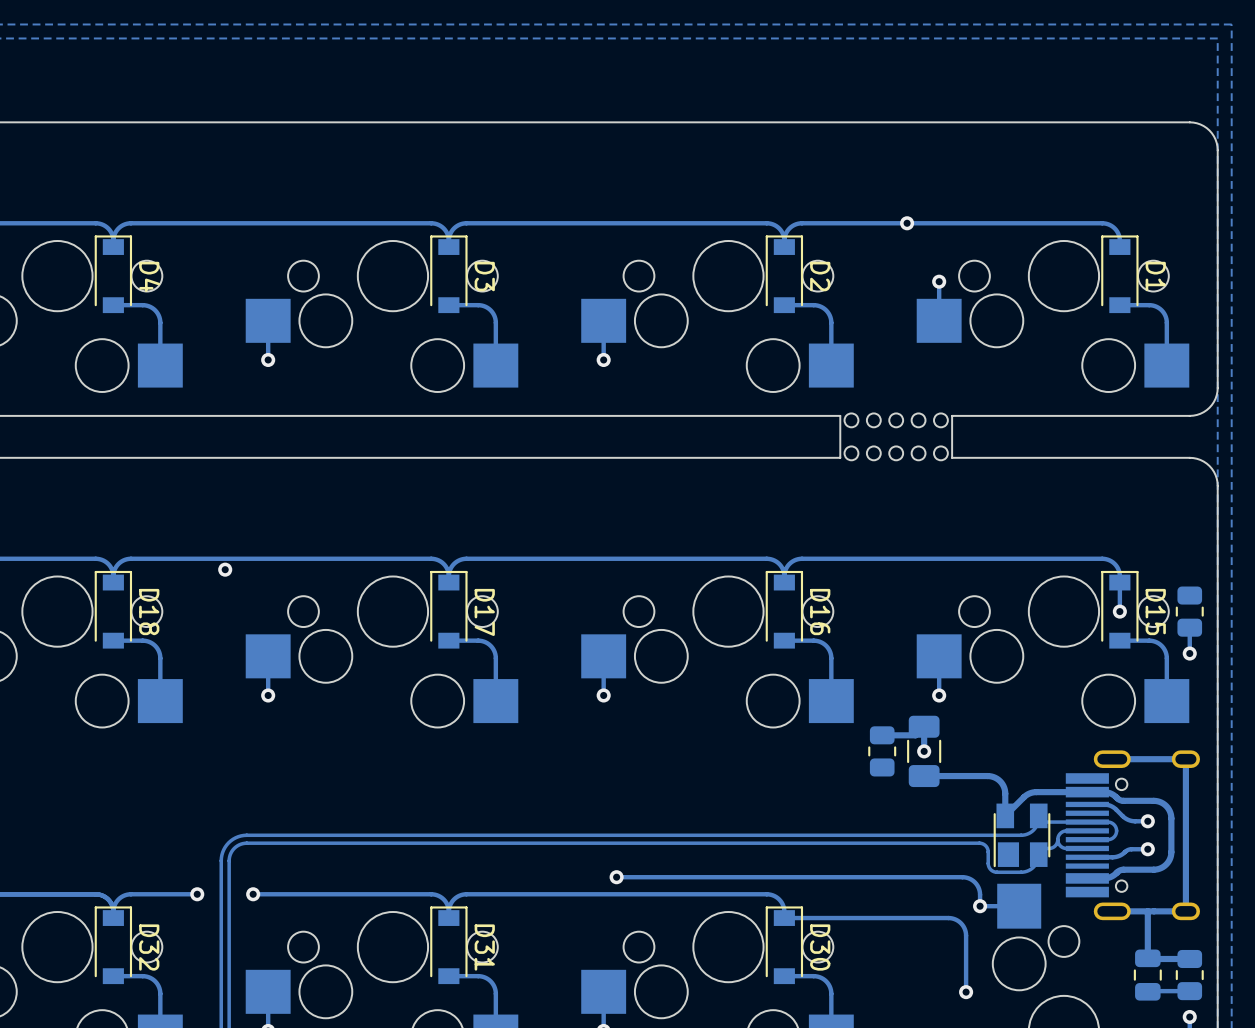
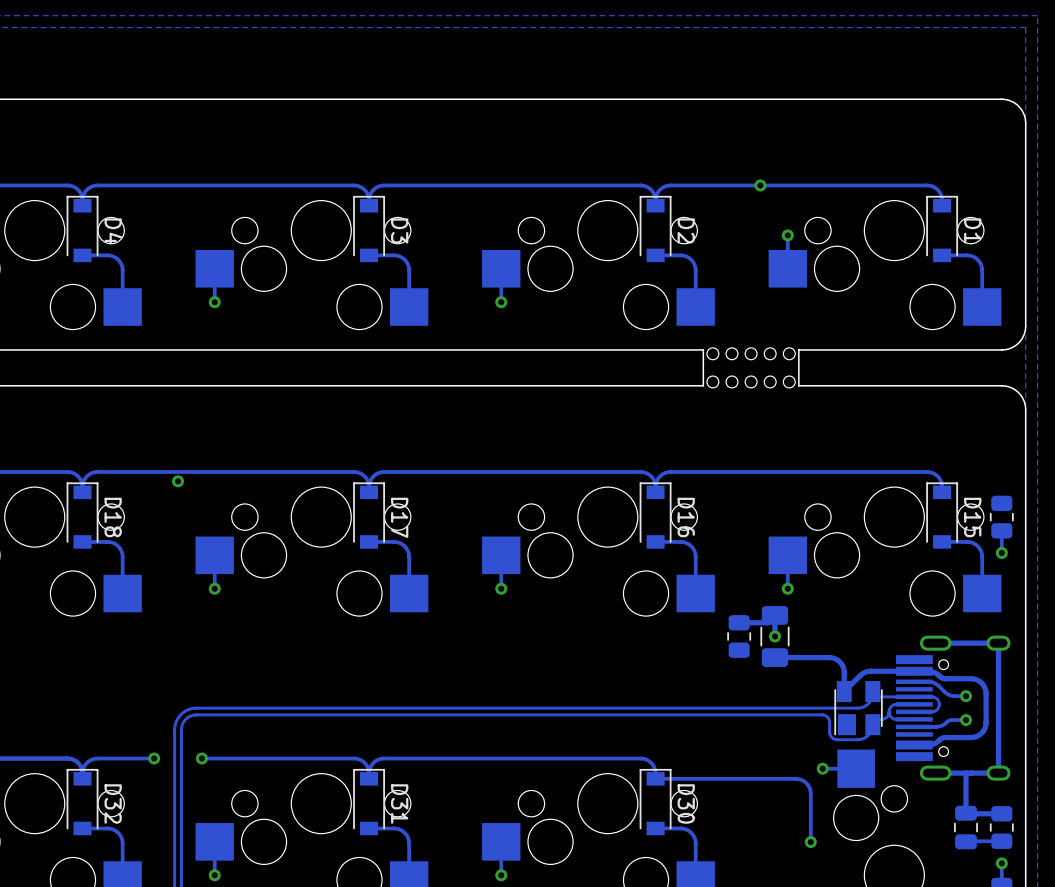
track: (1119, 582) (1119, 611) -> none
via: (1119, 611) -> none
track: (616, 877) (964, 877) (973, 881) (978, 887) (980, 906) -> none
via: (616, 877) -> none

